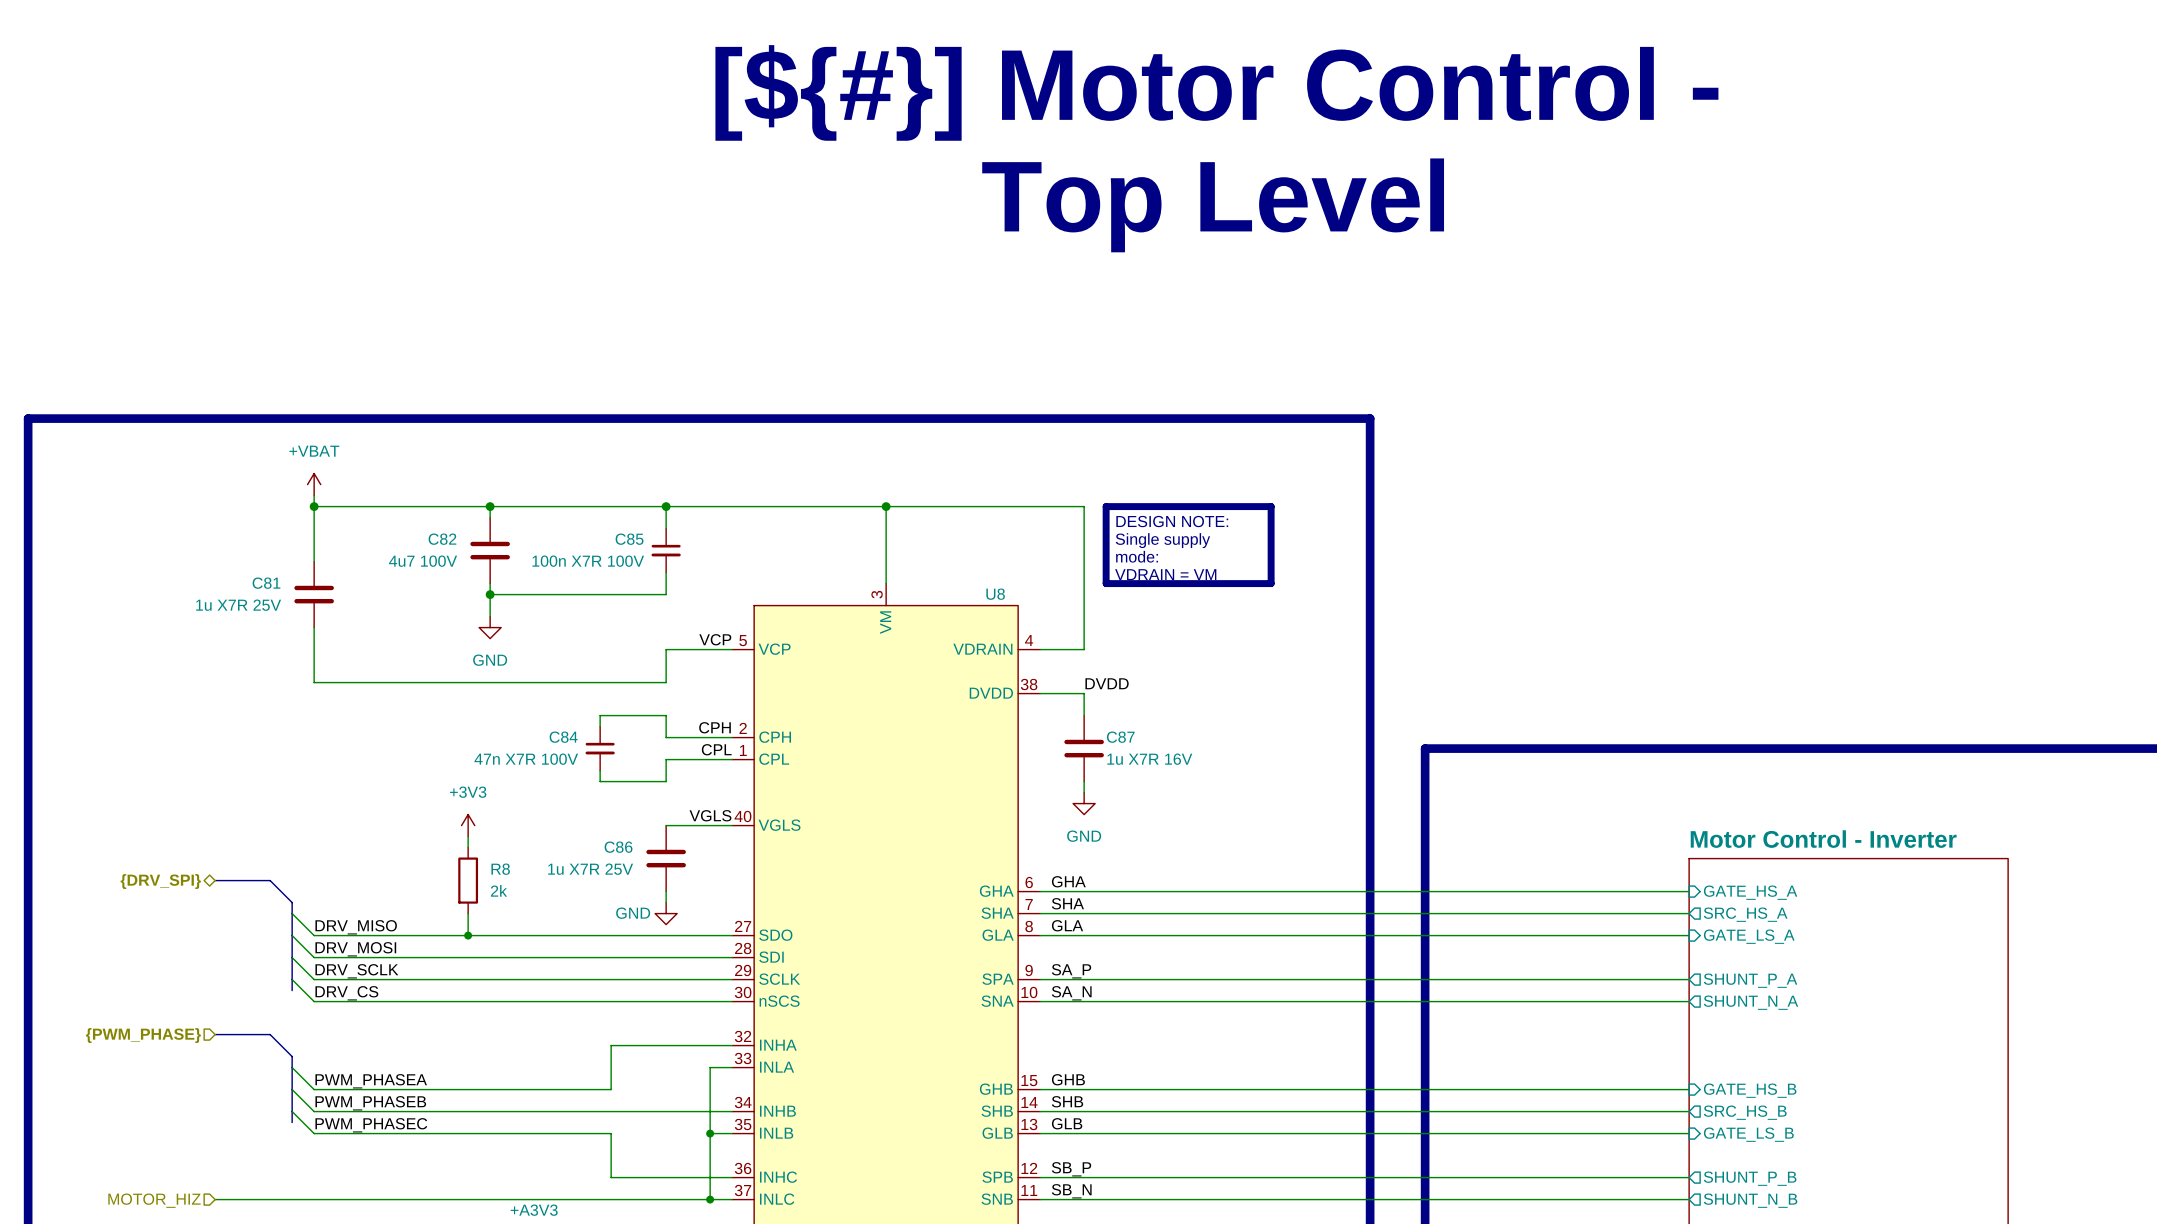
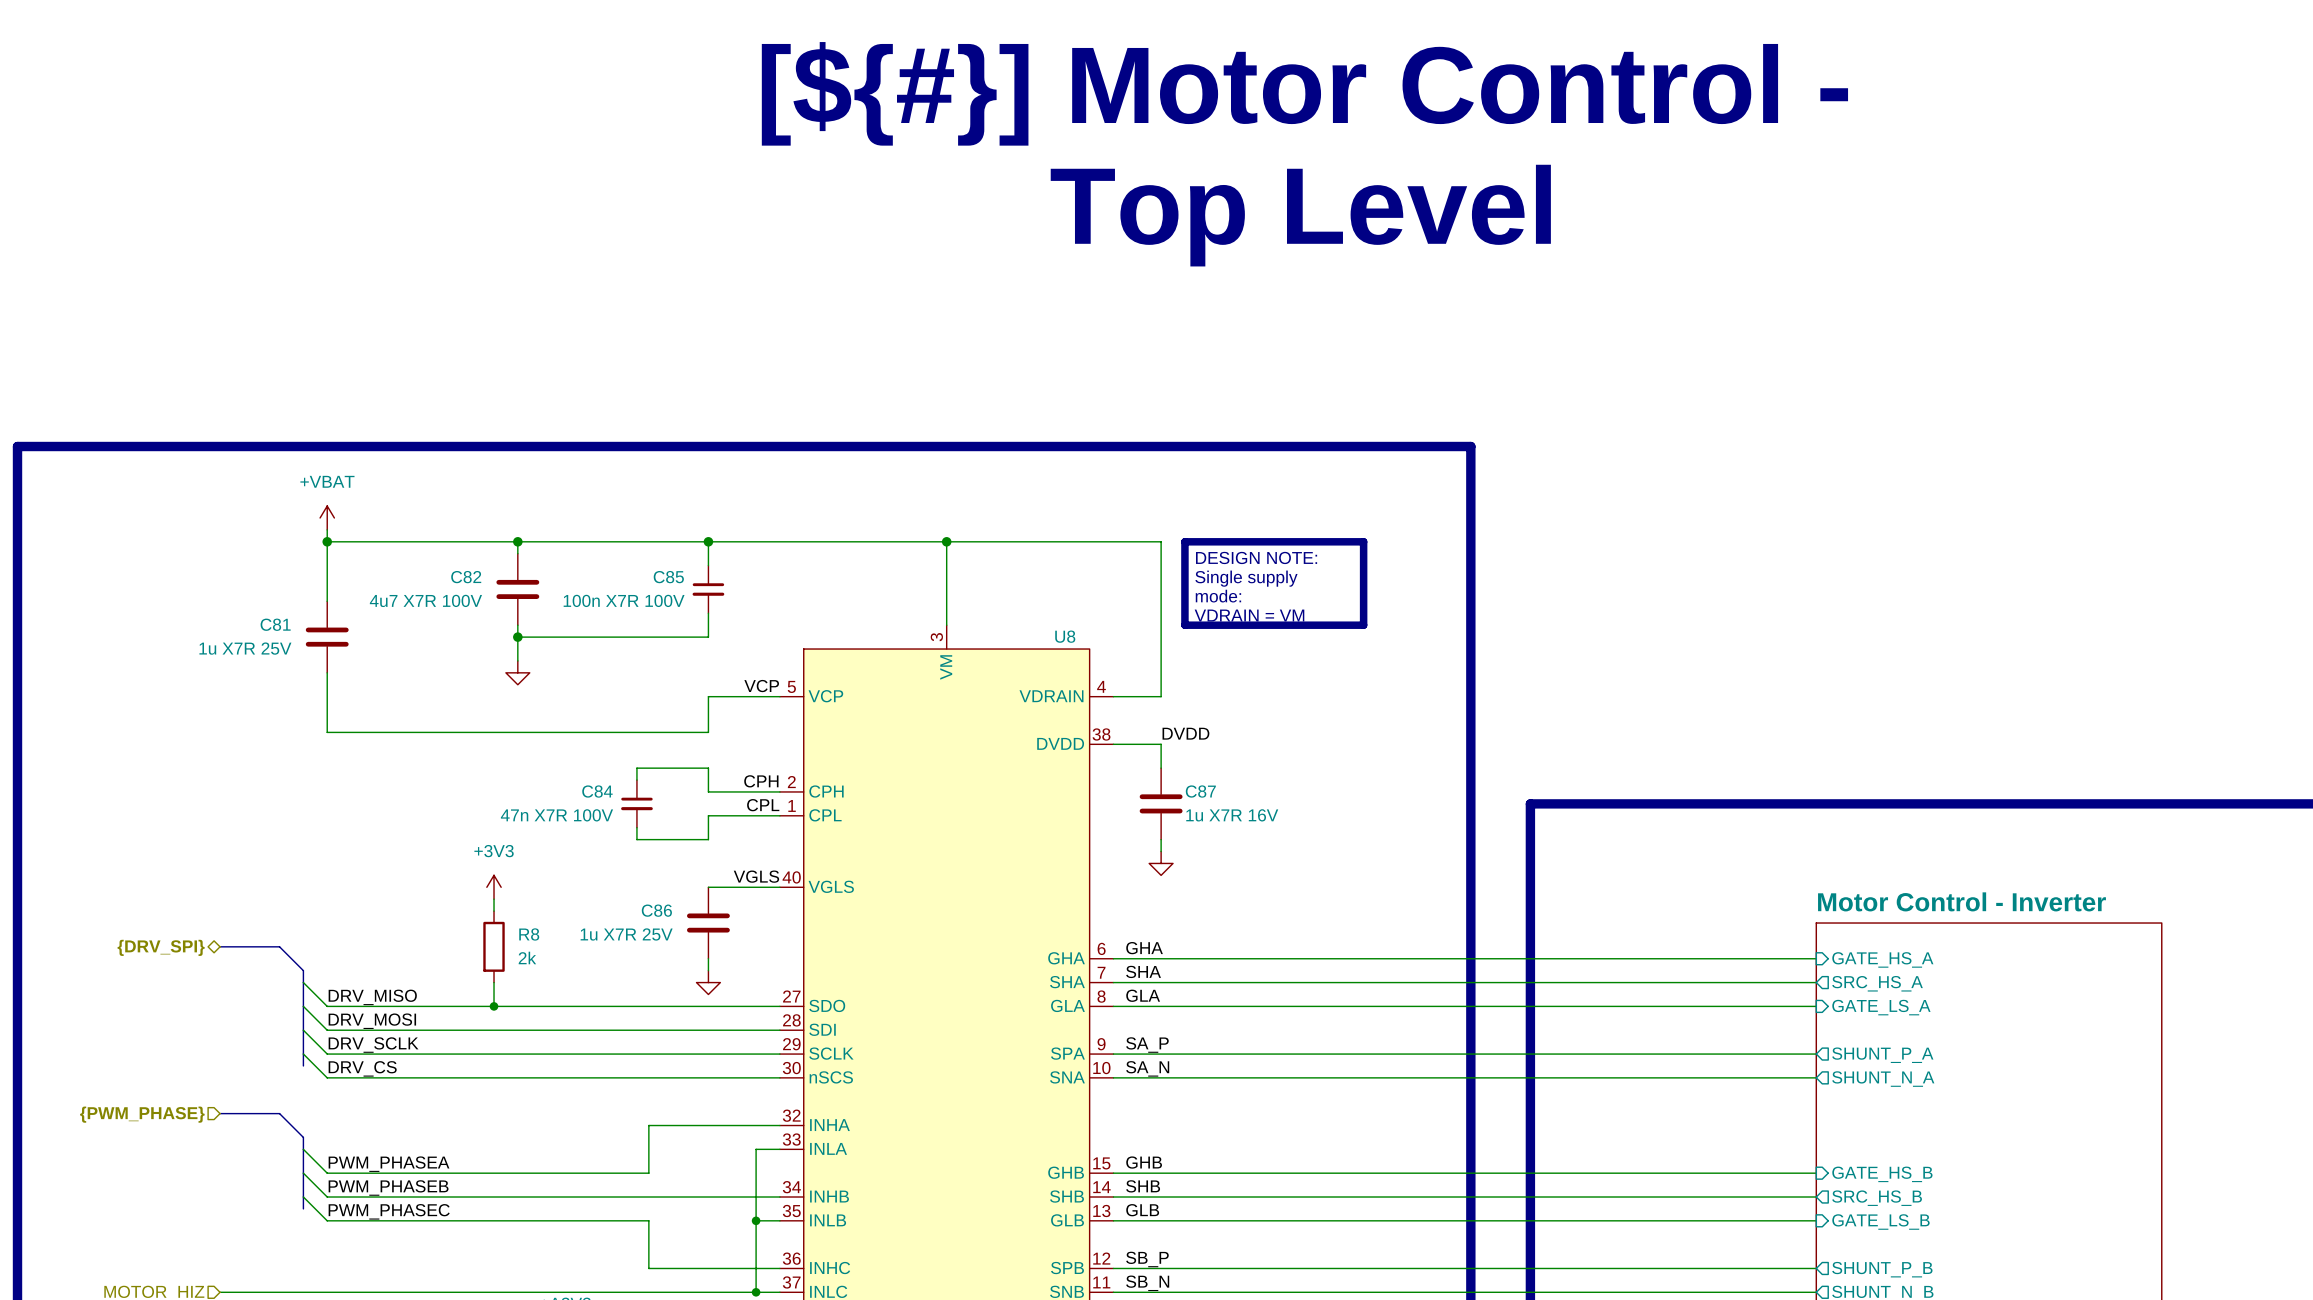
C82 value: 4u7 100V (423, 561) -> 4u7 X7R 100V (425, 600)
power symbol text: GND (490, 660) -> none
power symbol text: GND (1084, 836) -> none
power symbol text: GND (633, 913) -> none

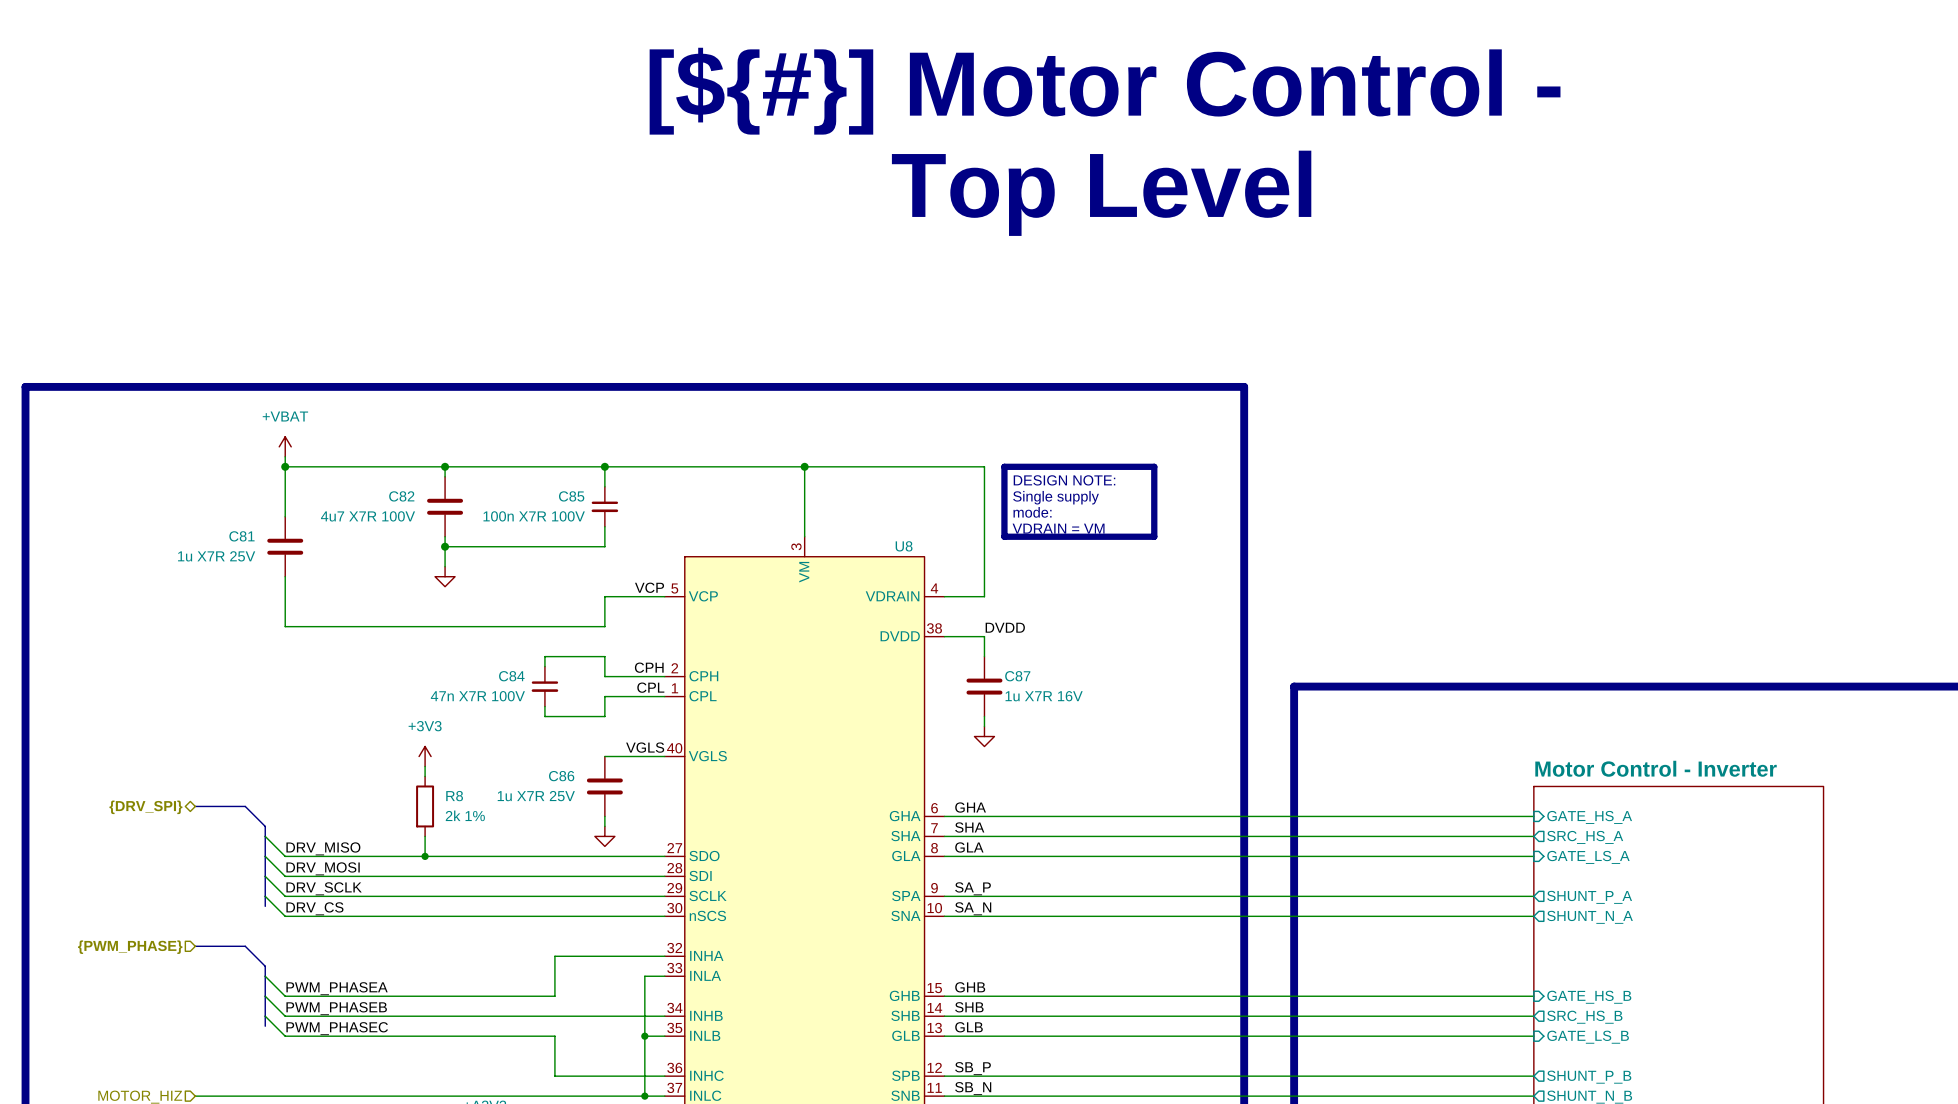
R8 value: 2k (527, 957) -> 2k 1% (465, 815)

